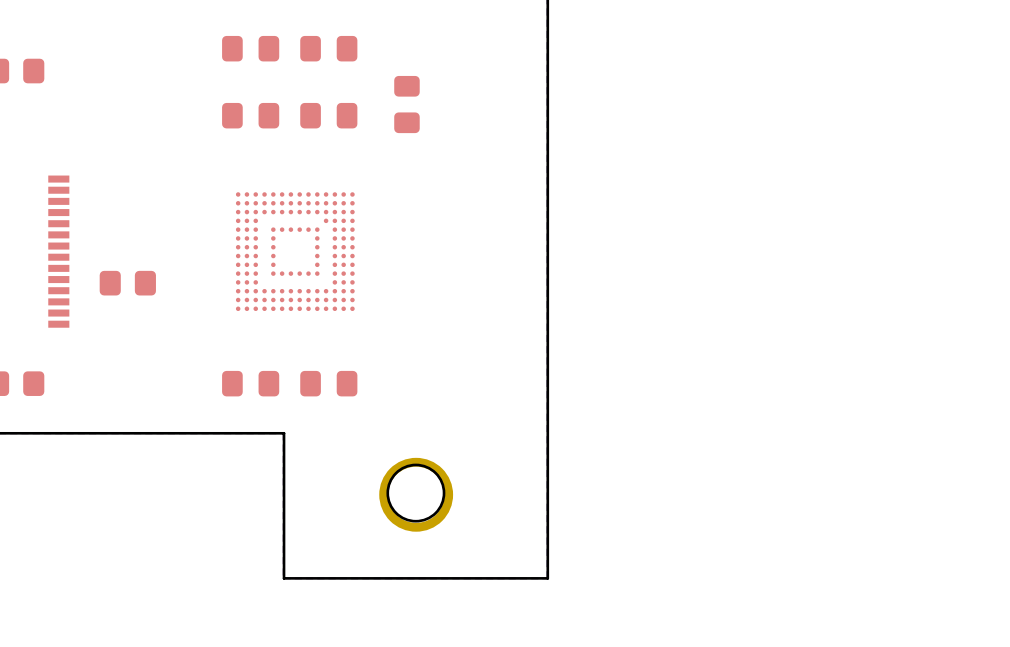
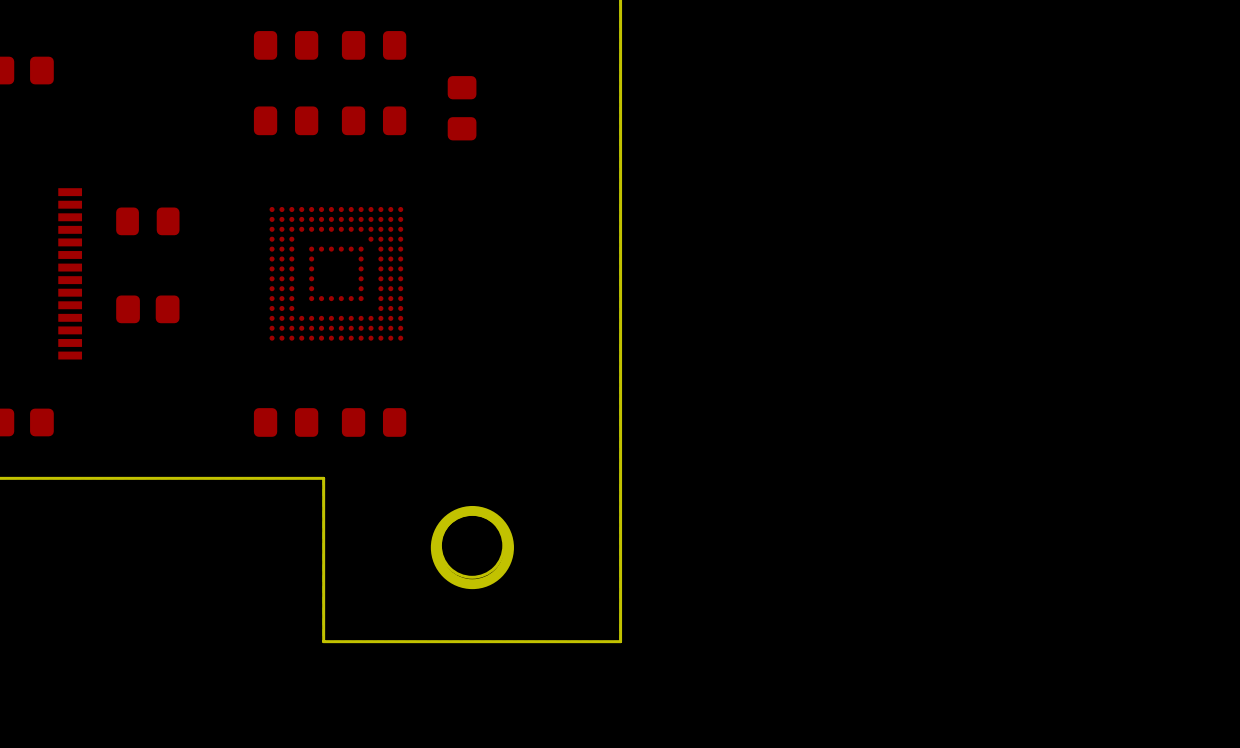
part: none -> (147, 221)

